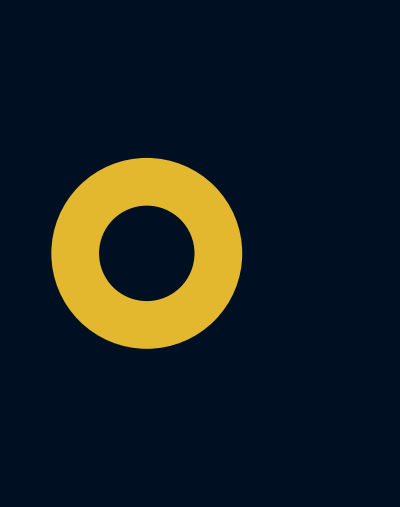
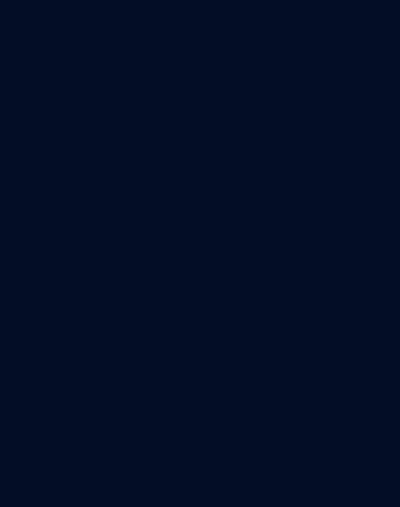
part: (146, 253) -> none

